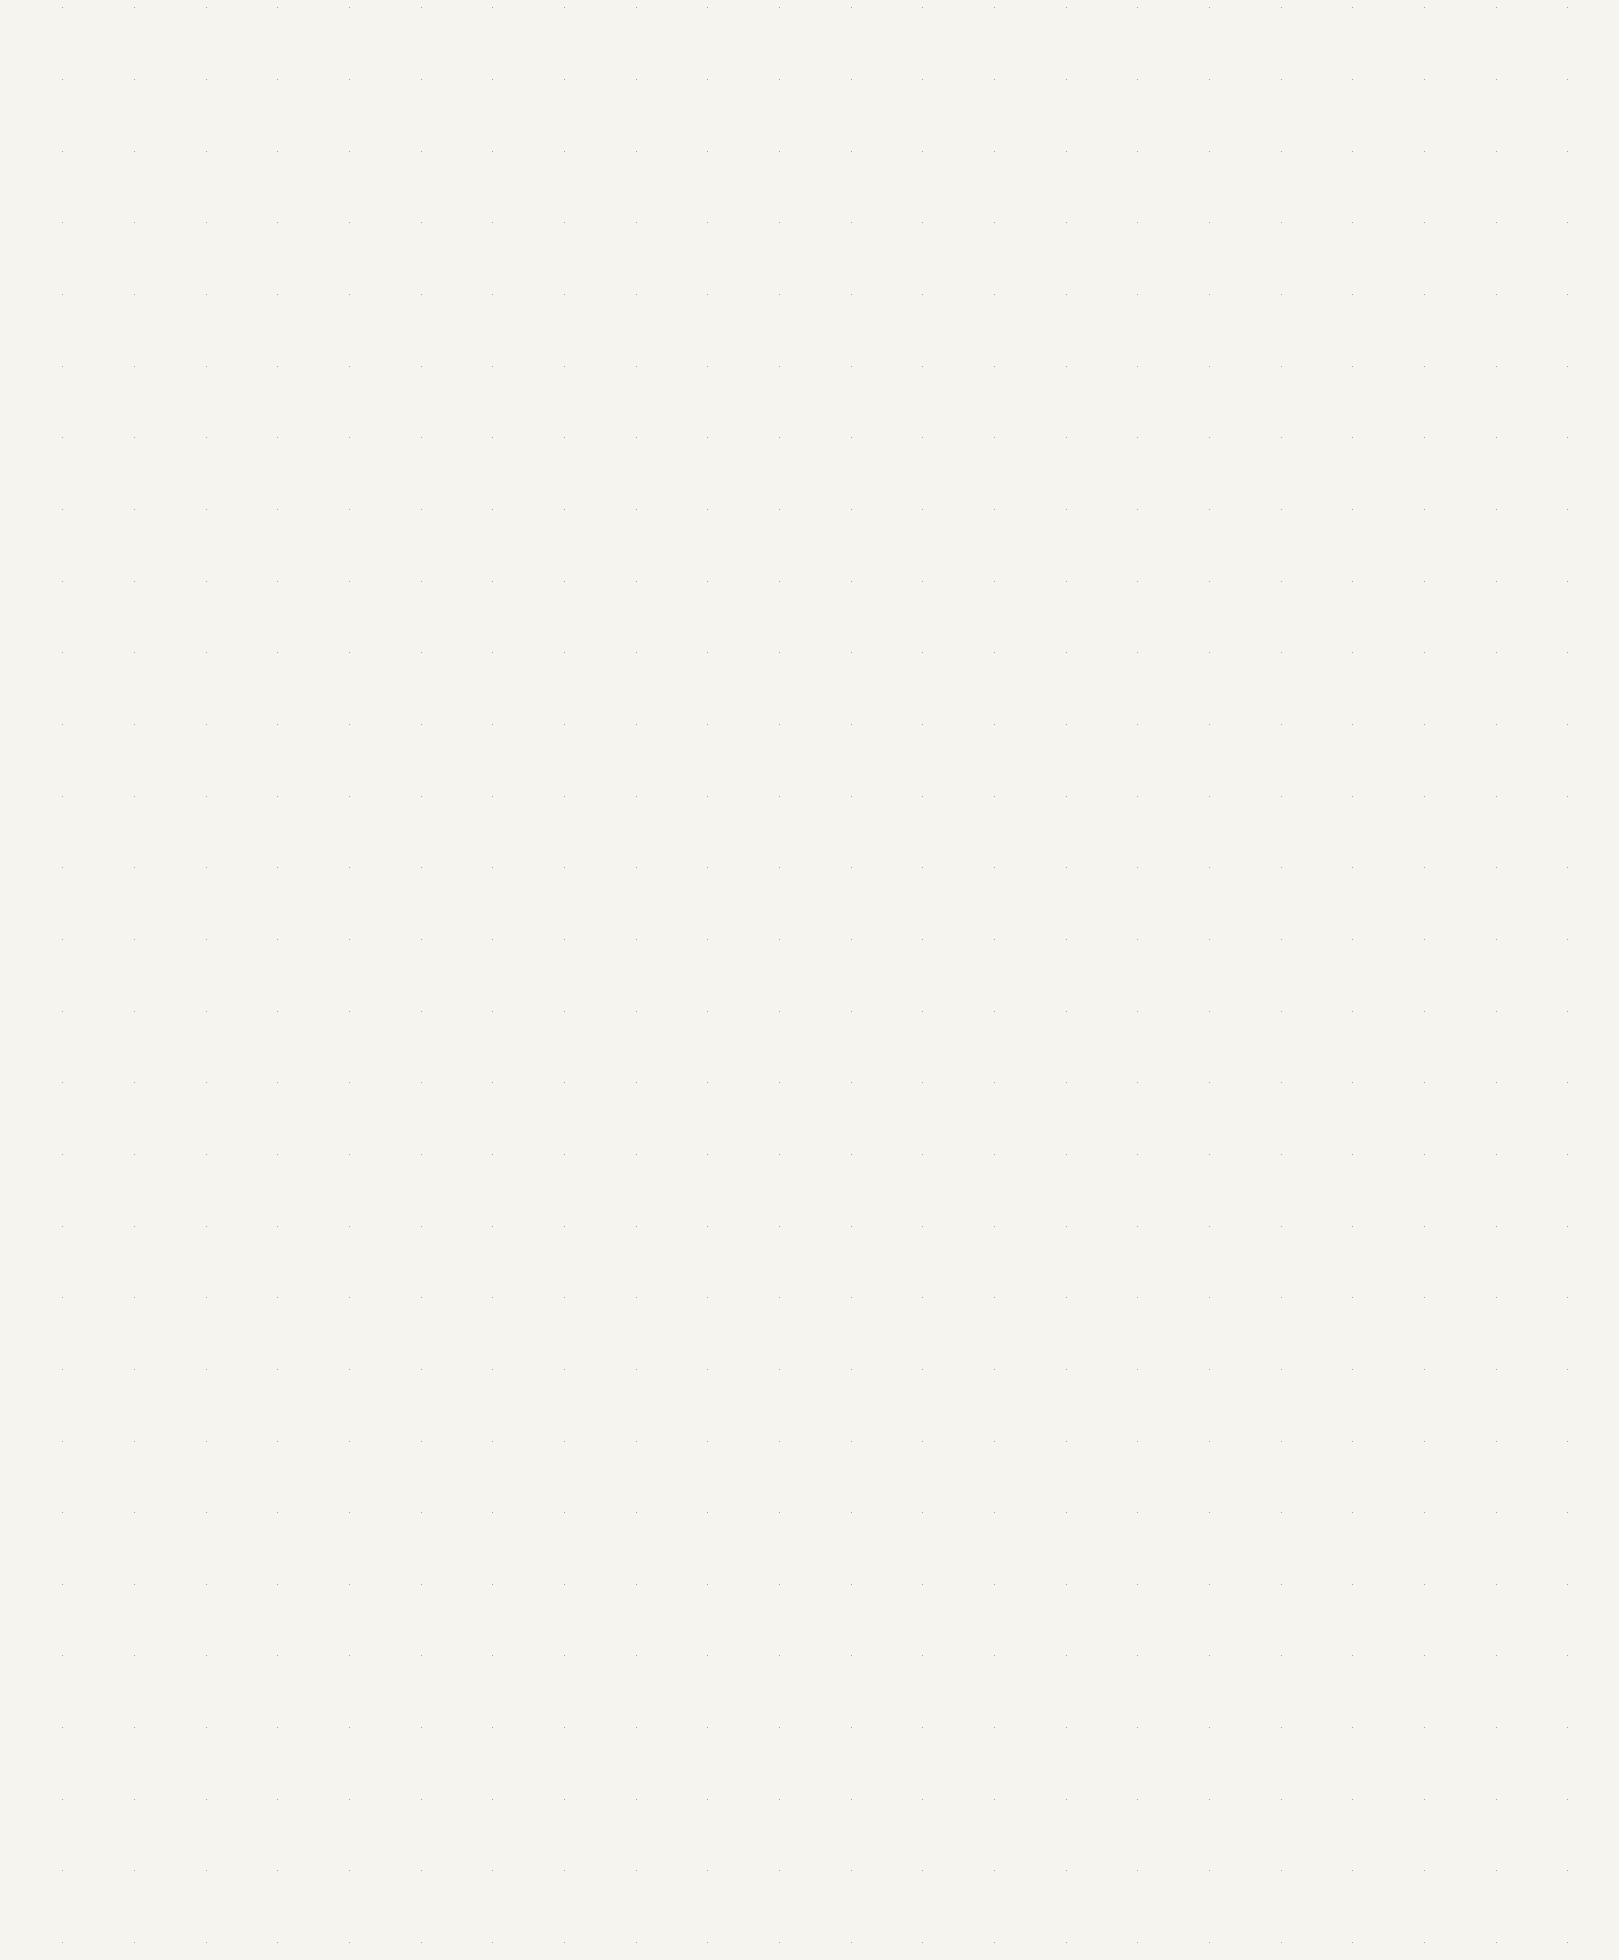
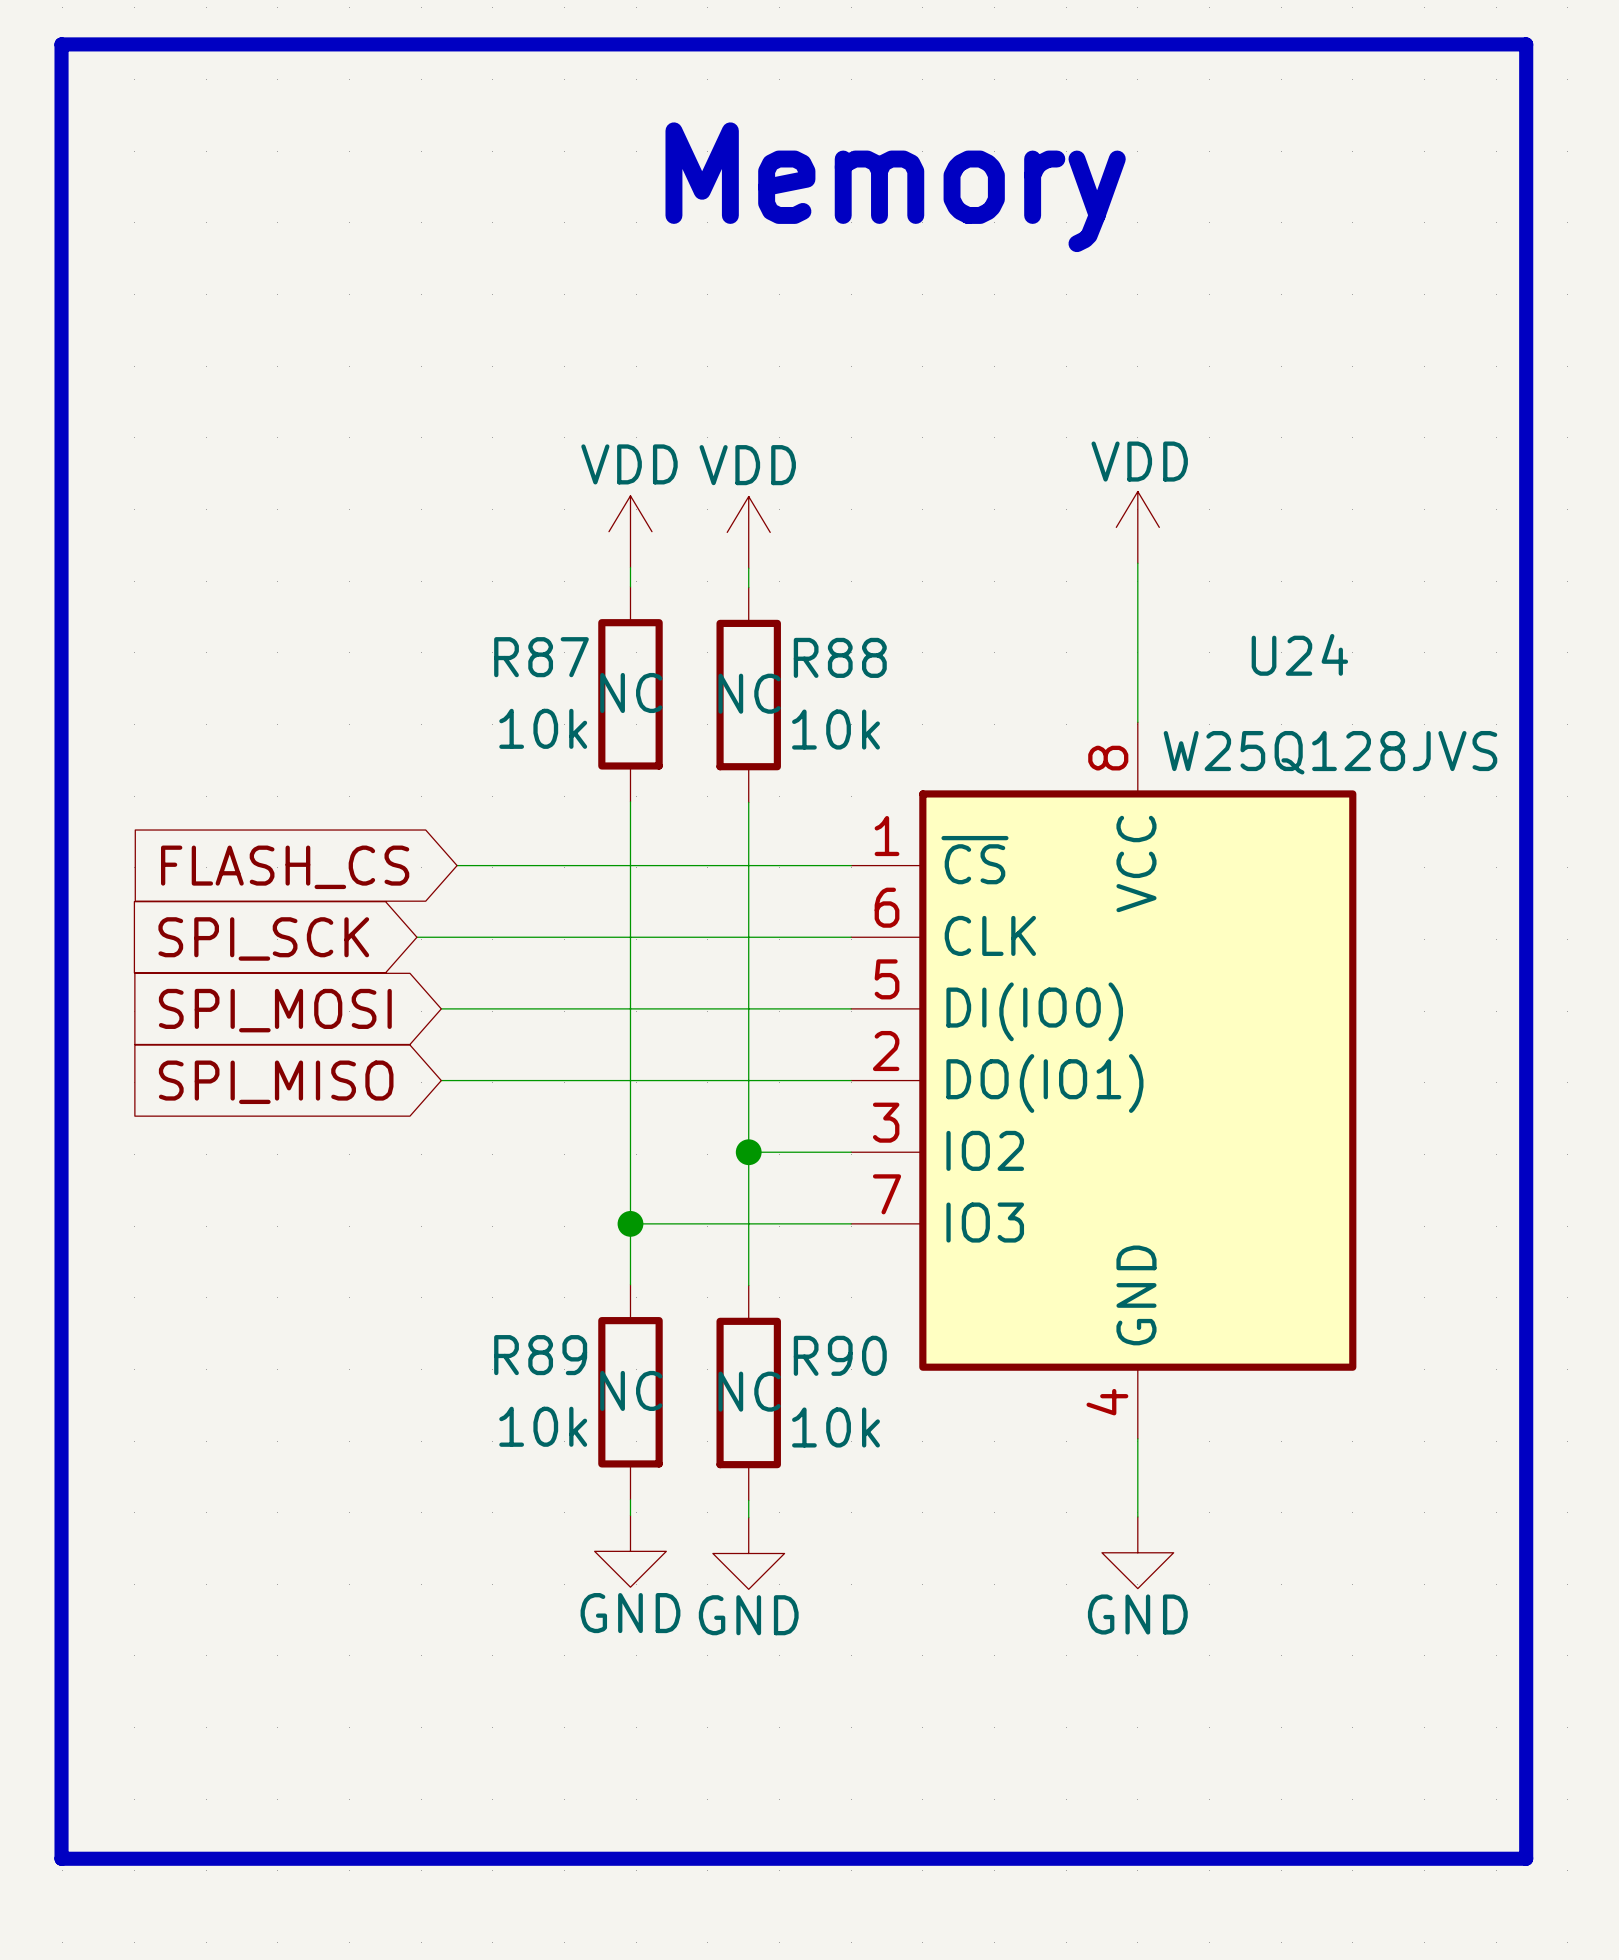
line: none -> (61, 44) (1526, 44) (1526, 1858) (61, 1858) (61, 44)
text: none -> Memory (895, 187)
power symbol: none -> VDD (1137, 527)
power symbol: none -> VDD (630, 531)
power symbol: none -> VDD (748, 532)
wire: none -> (1137, 563) (1137, 722)
wire: none -> (630, 567) (630, 586)
wire: none -> (748, 568) (748, 587)
R87: none -> 10k (630, 694)
R88: none -> 10k (748, 695)
wire: none -> (630, 801) (630, 1284)
wire: none -> (748, 802) (748, 1285)
wire: none -> (457, 865) (851, 865)
global label: none -> FLASH_CS (285, 867)
wire: none -> (416, 937) (851, 937)
global label: none -> SPI_SCK (263, 938)
wire: none -> (441, 1008) (851, 1008)
global label: none -> SPI_MOSI (275, 1010)
wire: none -> (441, 1080) (851, 1080)
U24: none -> W25Q128JVS (1103, 1080)
global label: none -> SPI_MISO (276, 1082)
wire: none -> (748, 1152) (851, 1152)
junction: none -> (748, 1152)
wire: none -> (630, 1223) (851, 1223)
junction: none -> (630, 1223)
R89: none -> 10k (630, 1392)
R90: none -> 10k (748, 1392)
wire: none -> (1137, 1438) (1137, 1516)
wire: none -> (630, 1499) (630, 1515)
wire: none -> (748, 1500) (748, 1517)
power symbol: none -> GND (630, 1551)
power symbol: none -> GND (1137, 1552)
power symbol: none -> GND (748, 1553)

